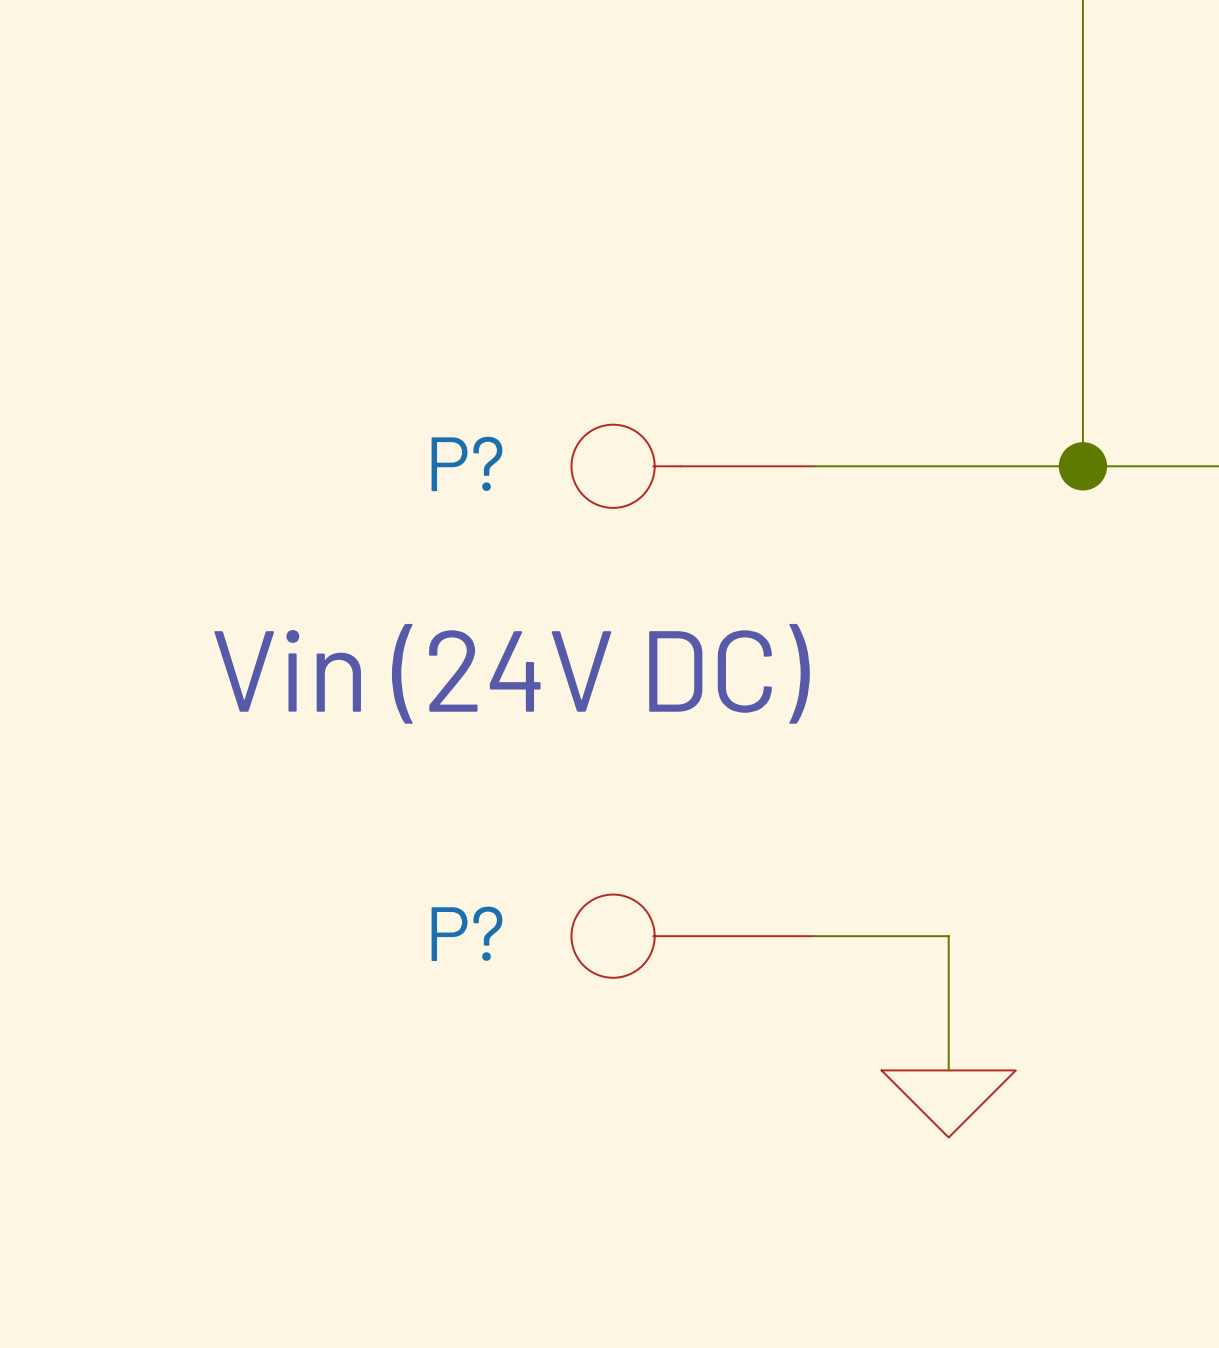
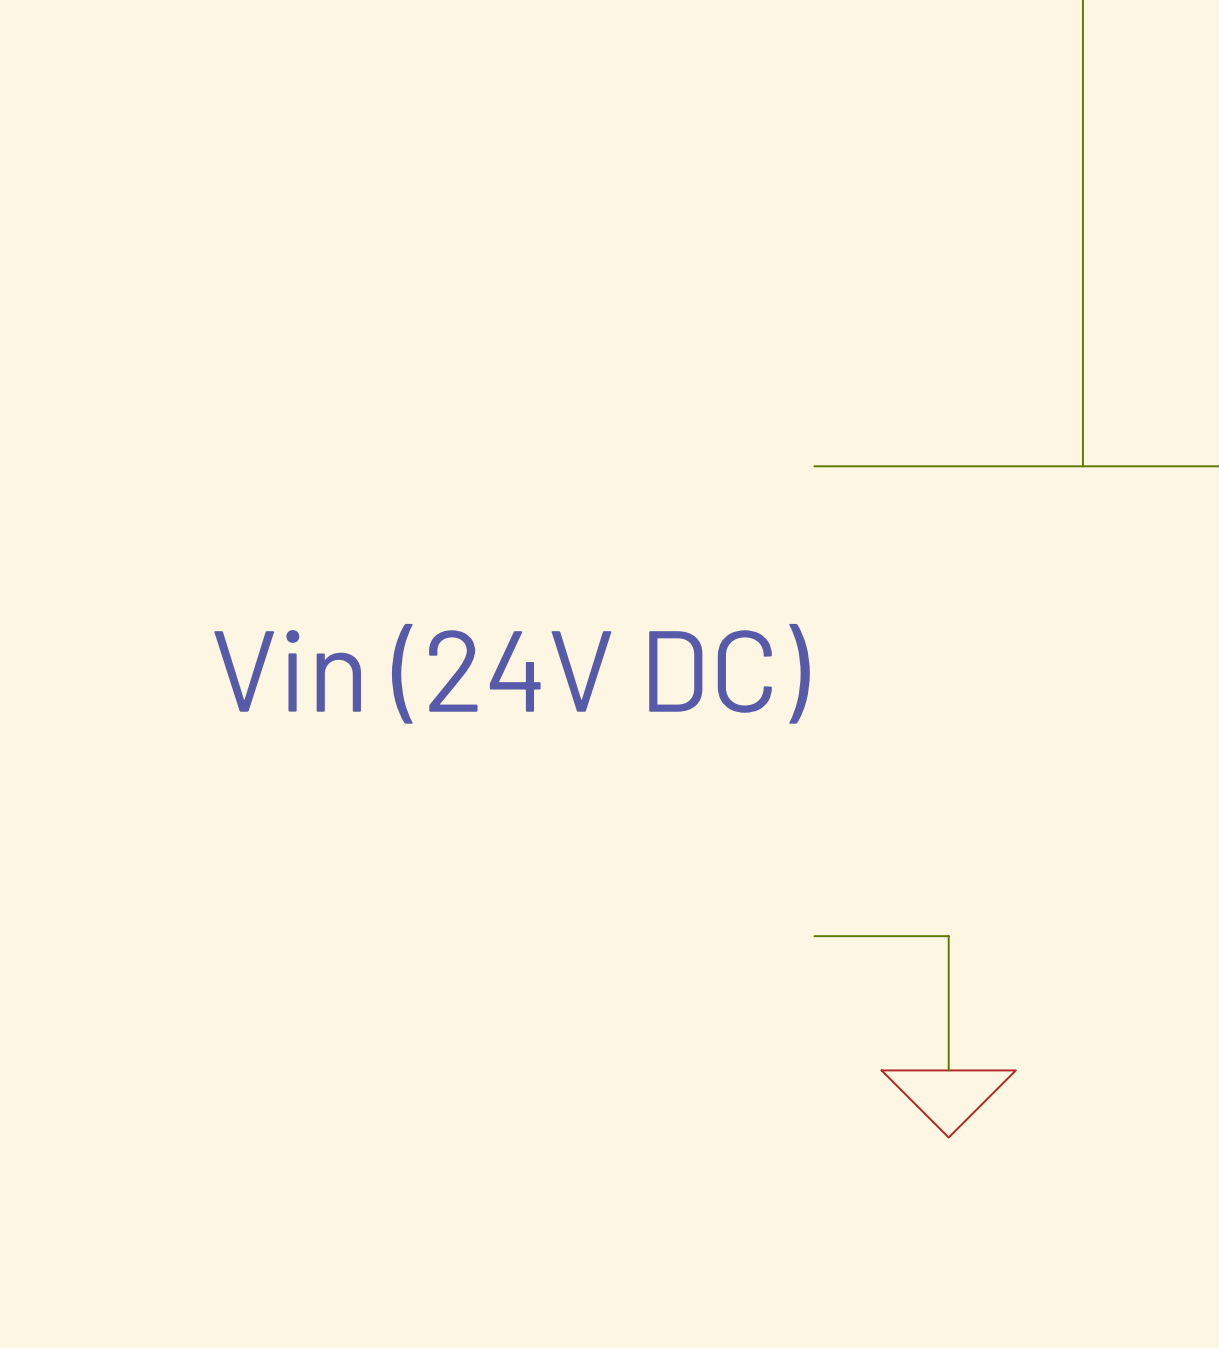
P?: (692, 466) -> none
junction: (1082, 466) -> none
P?: (692, 936) -> none

